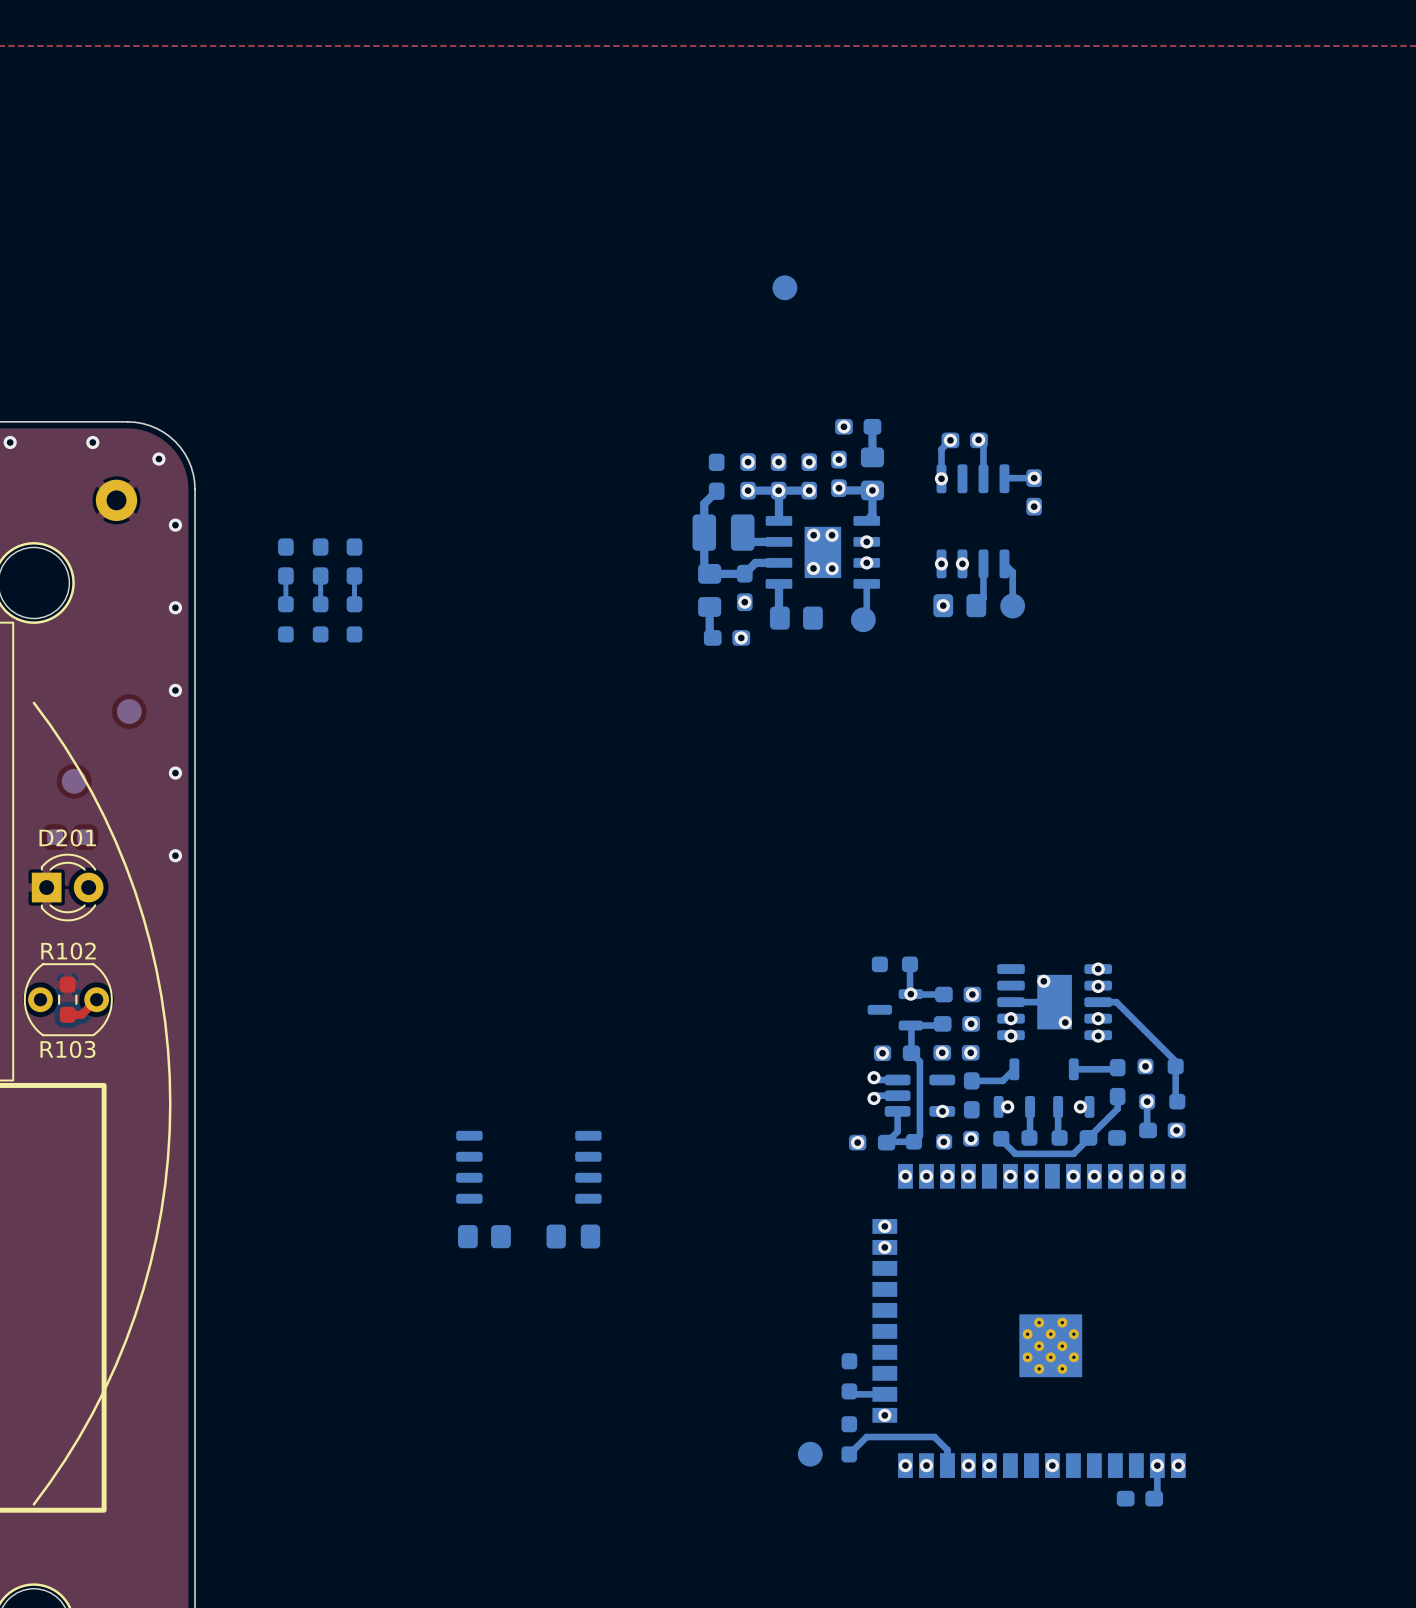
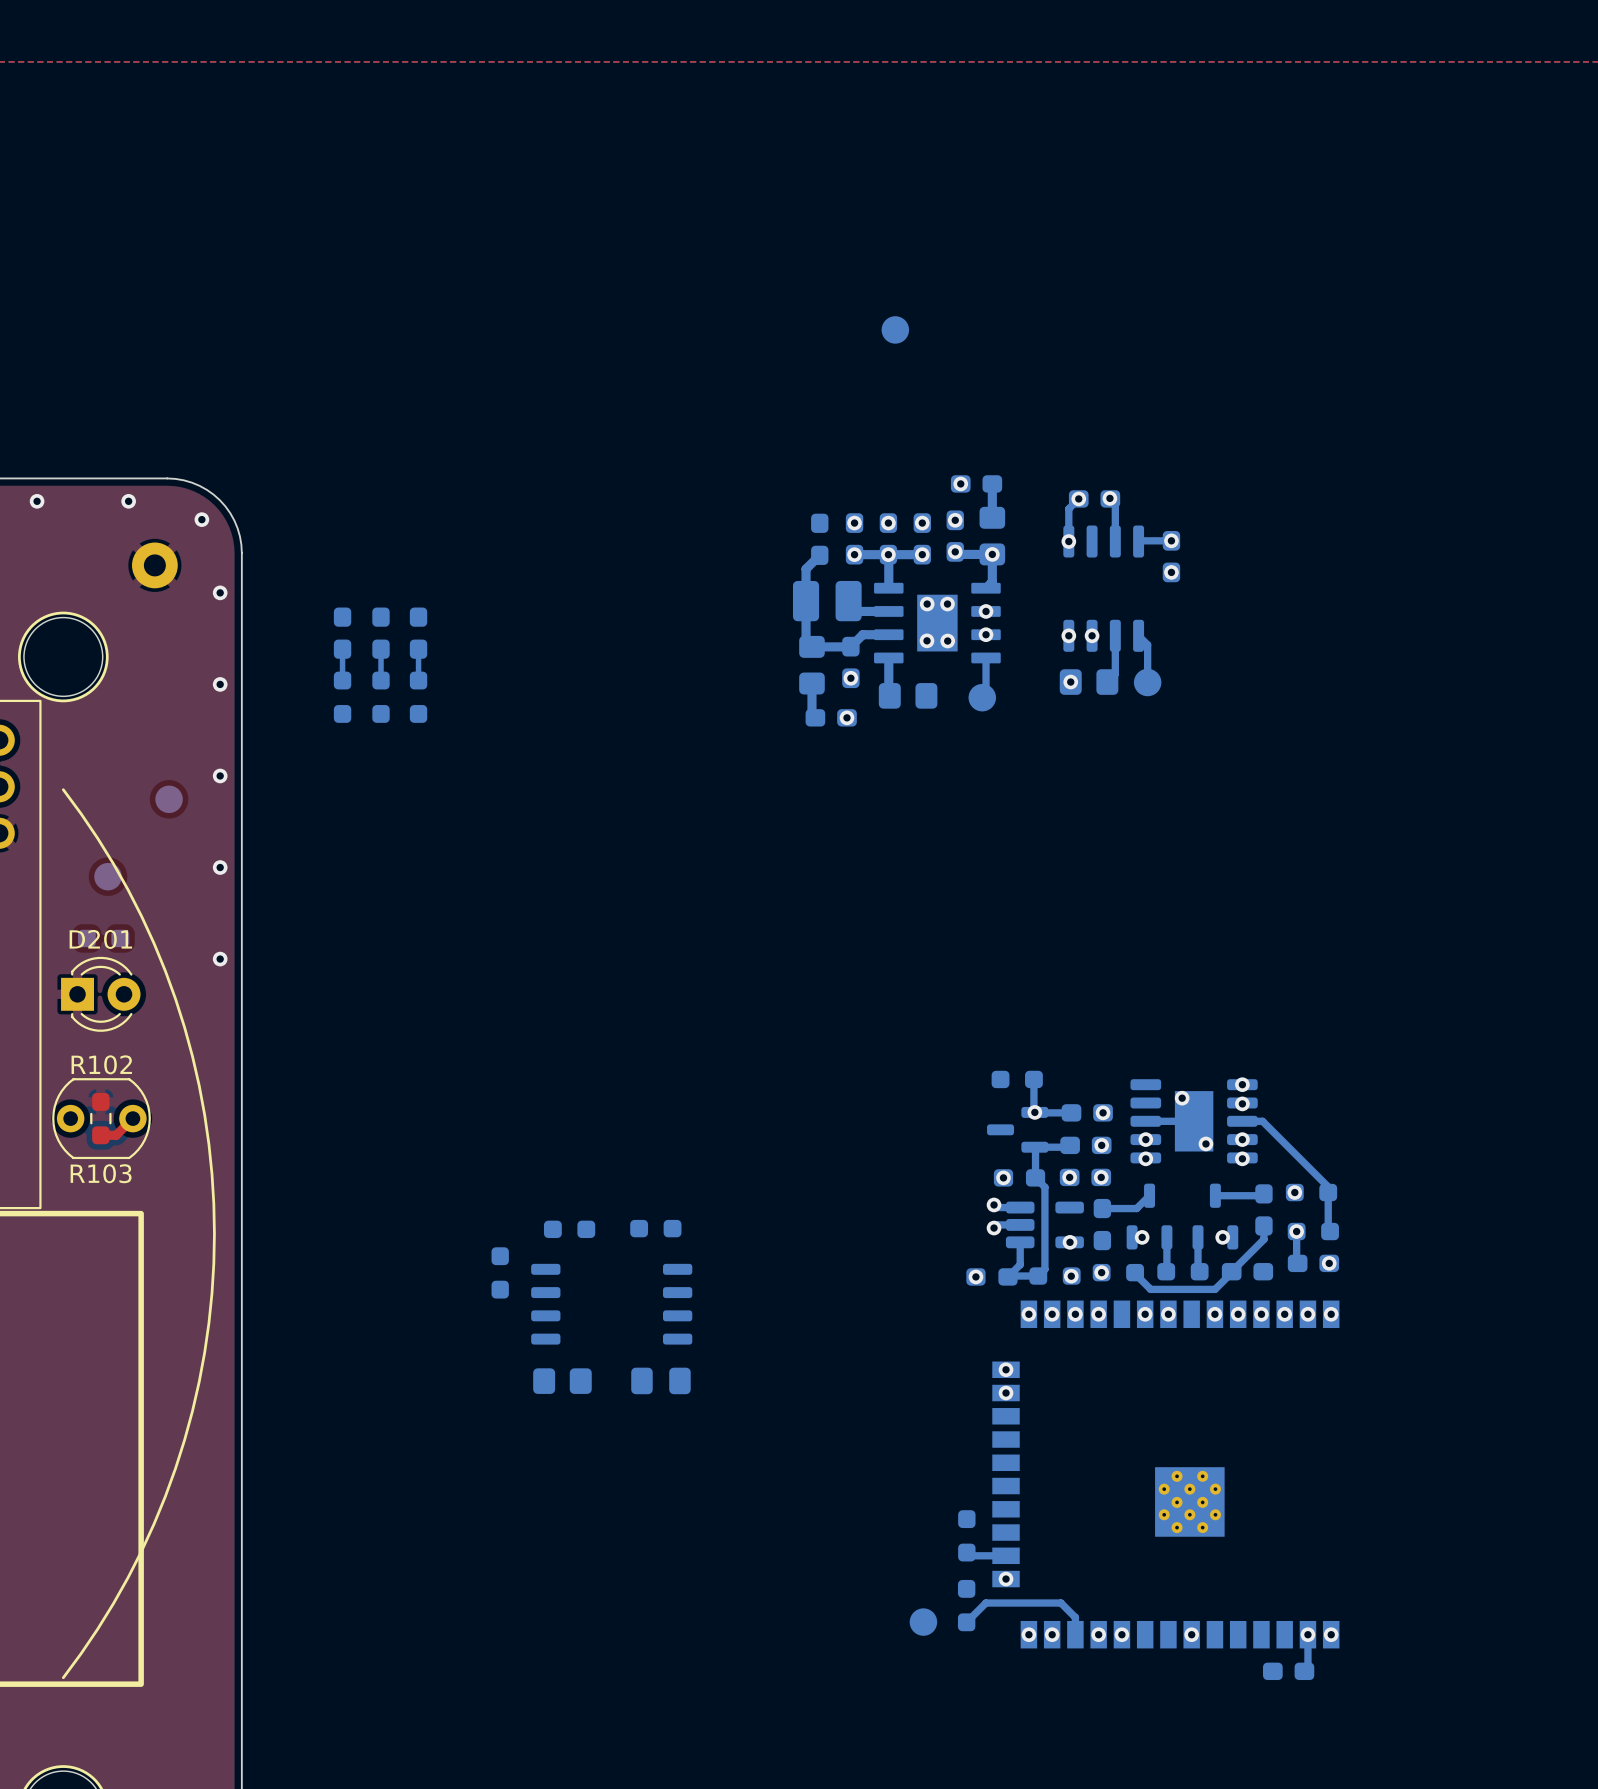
part: none -> (655, 1228)
part: none -> (569, 1229)
part: none -> (500, 1272)

